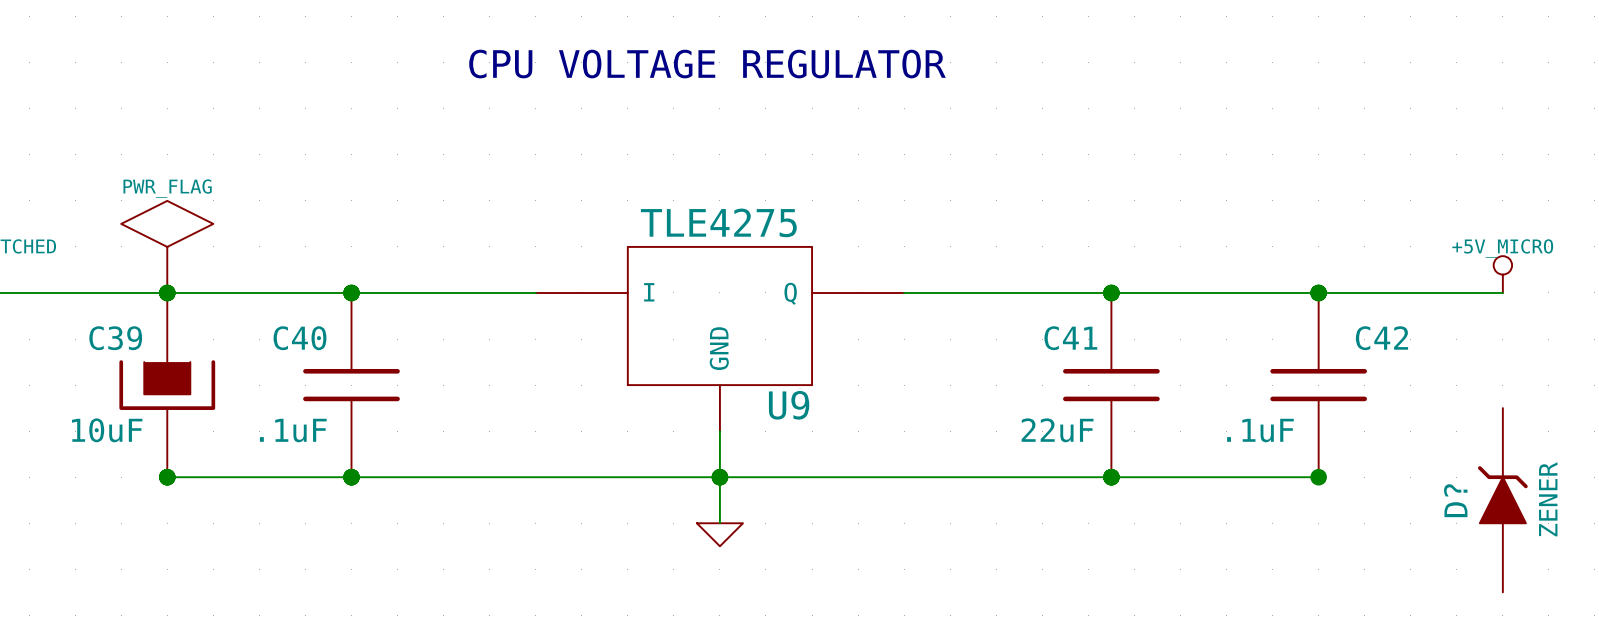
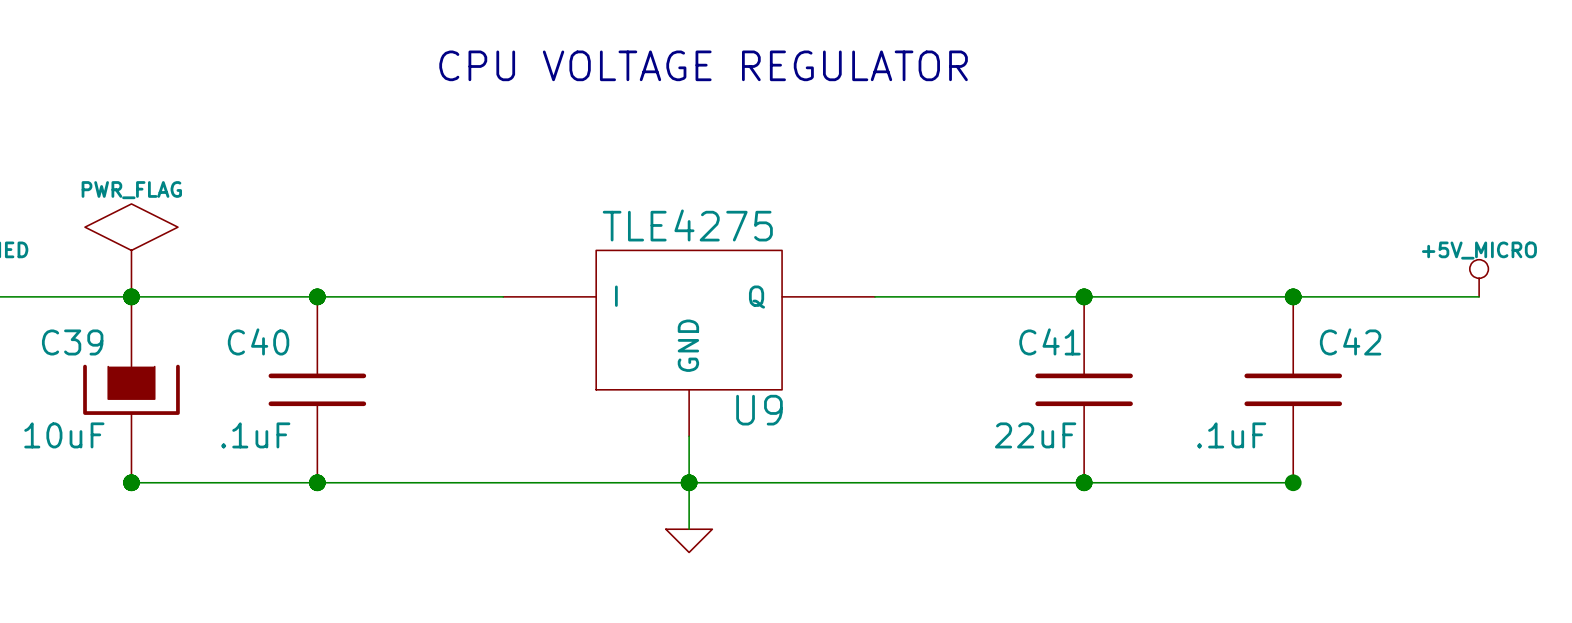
D?: ZENER (1502, 500) -> none

